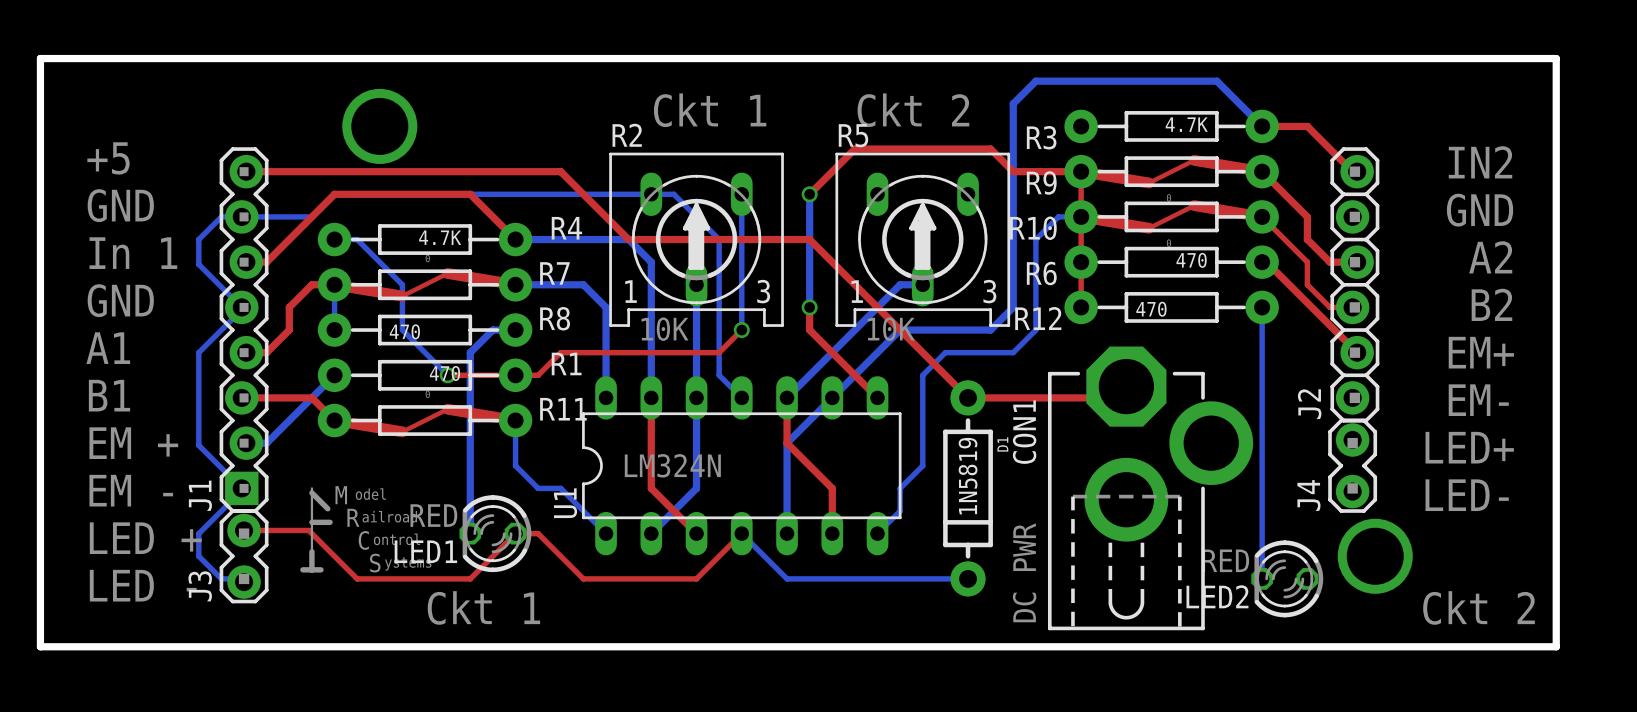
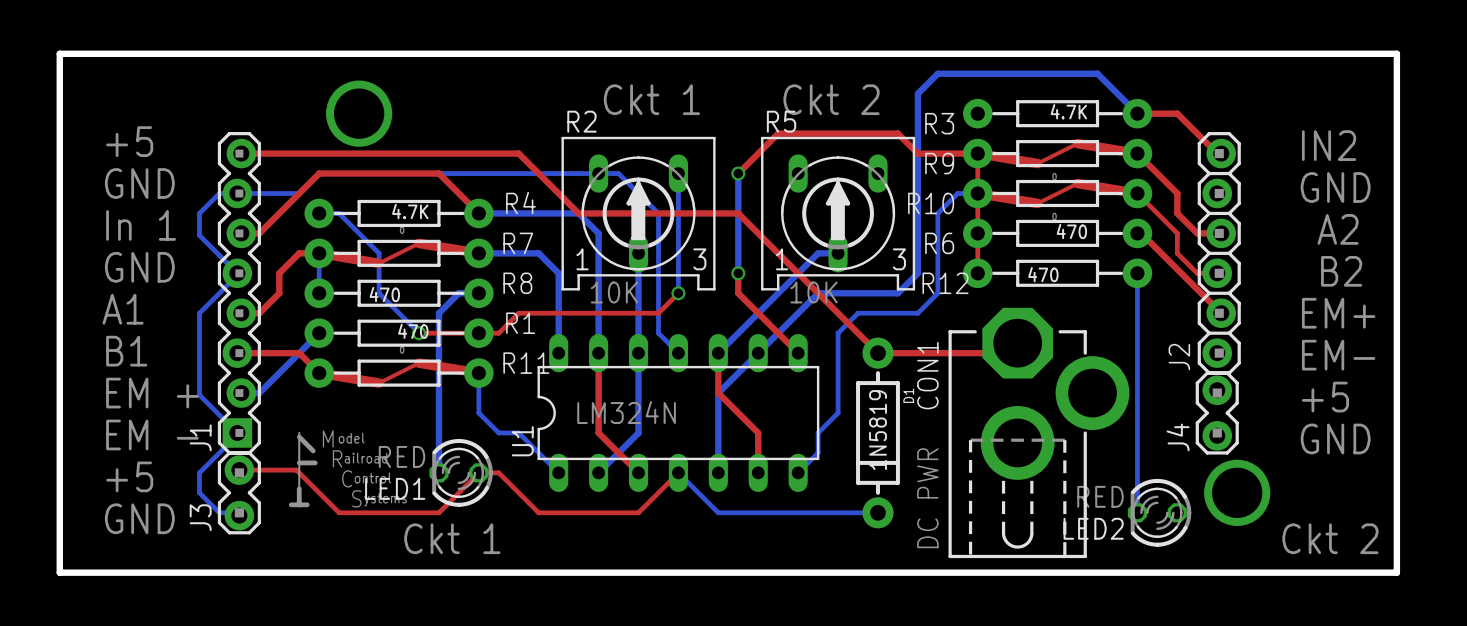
text: LED+ (1469, 447) -> +5 (1325, 397)
text: LED- (1467, 495) -> GND (1335, 438)
text: LED + (145, 538) -> +5 (129, 476)
text: LED - (143, 585) -> GND (139, 518)

